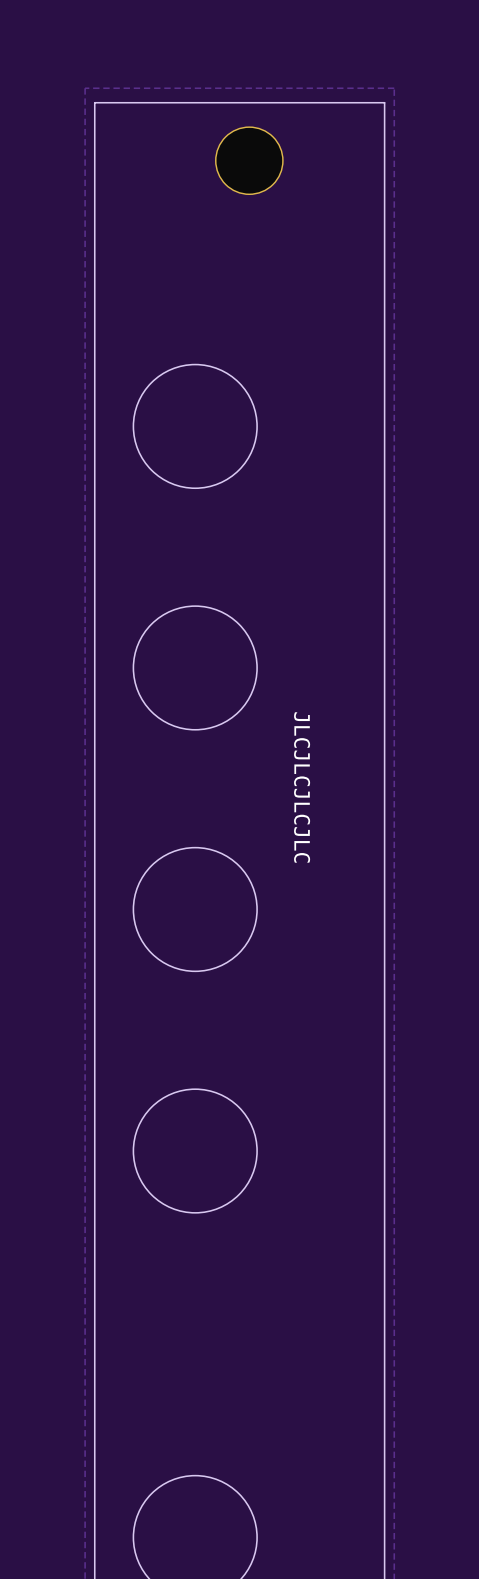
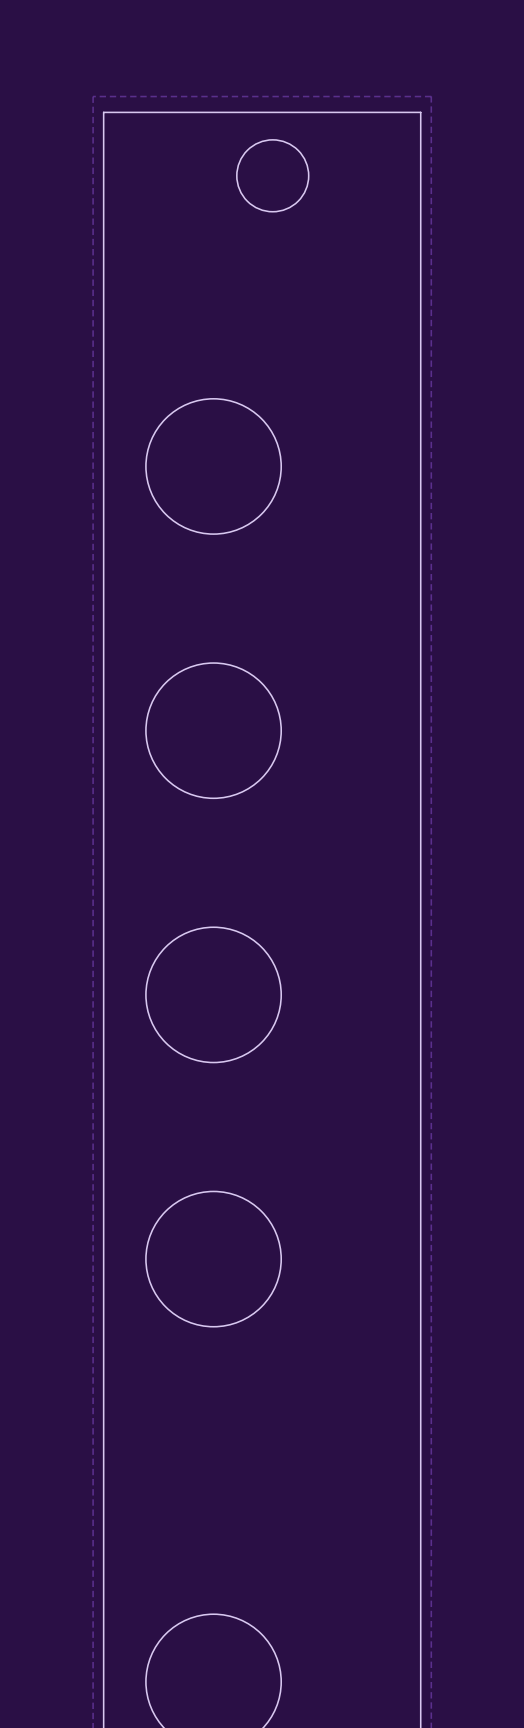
round board edge: none -> [236, 139, 310, 213]
part: (249, 160) -> none
text: JLCJLCJLCJLC (302, 787) -> none

